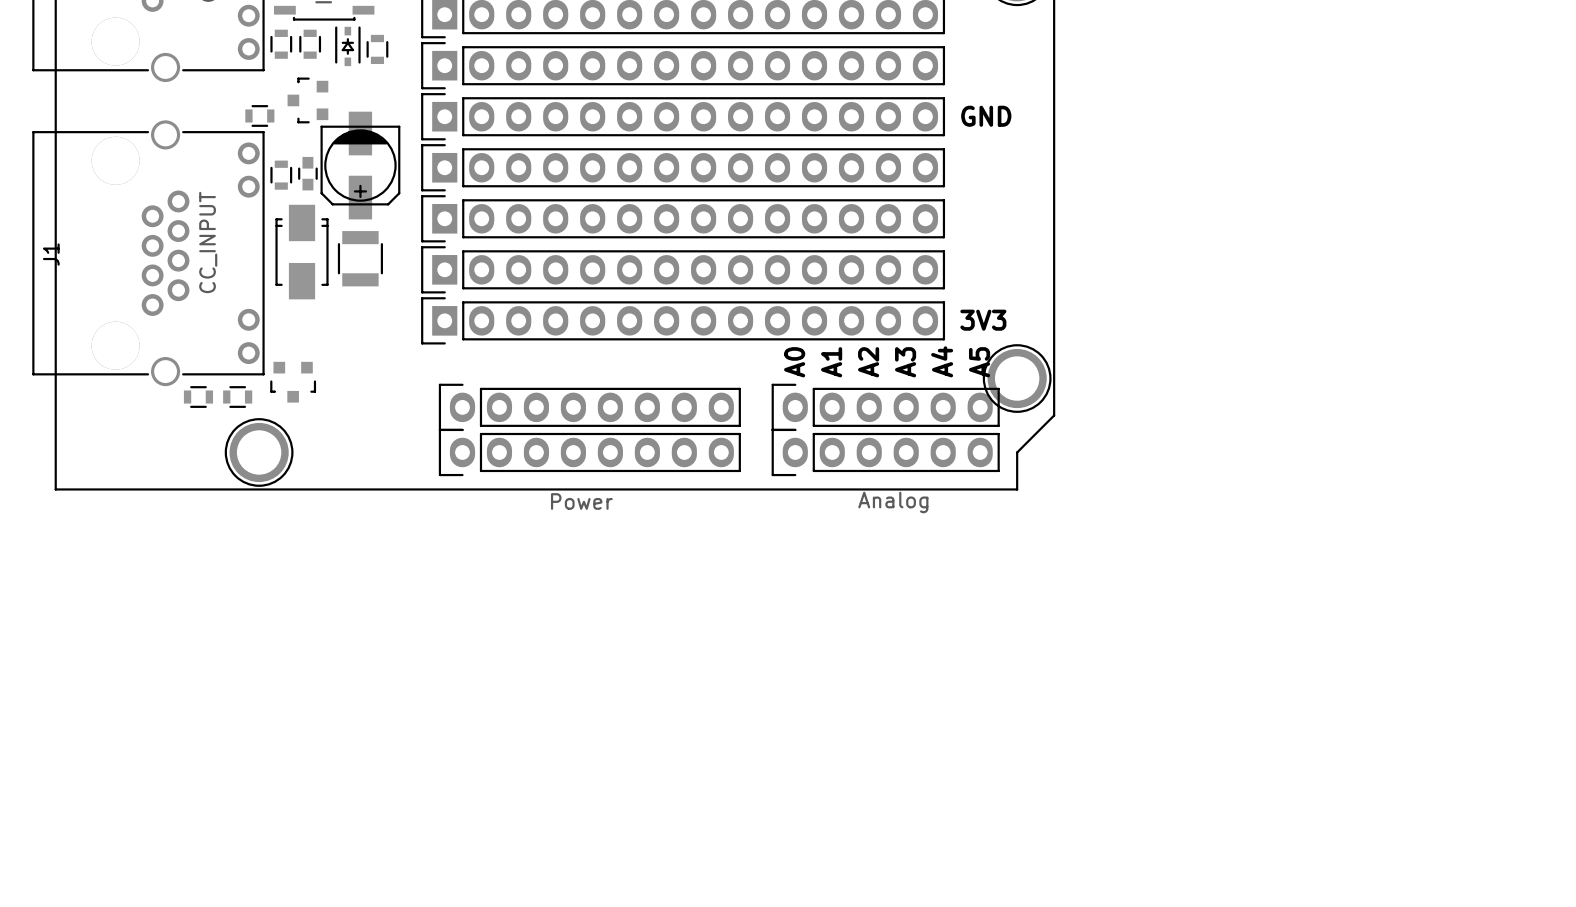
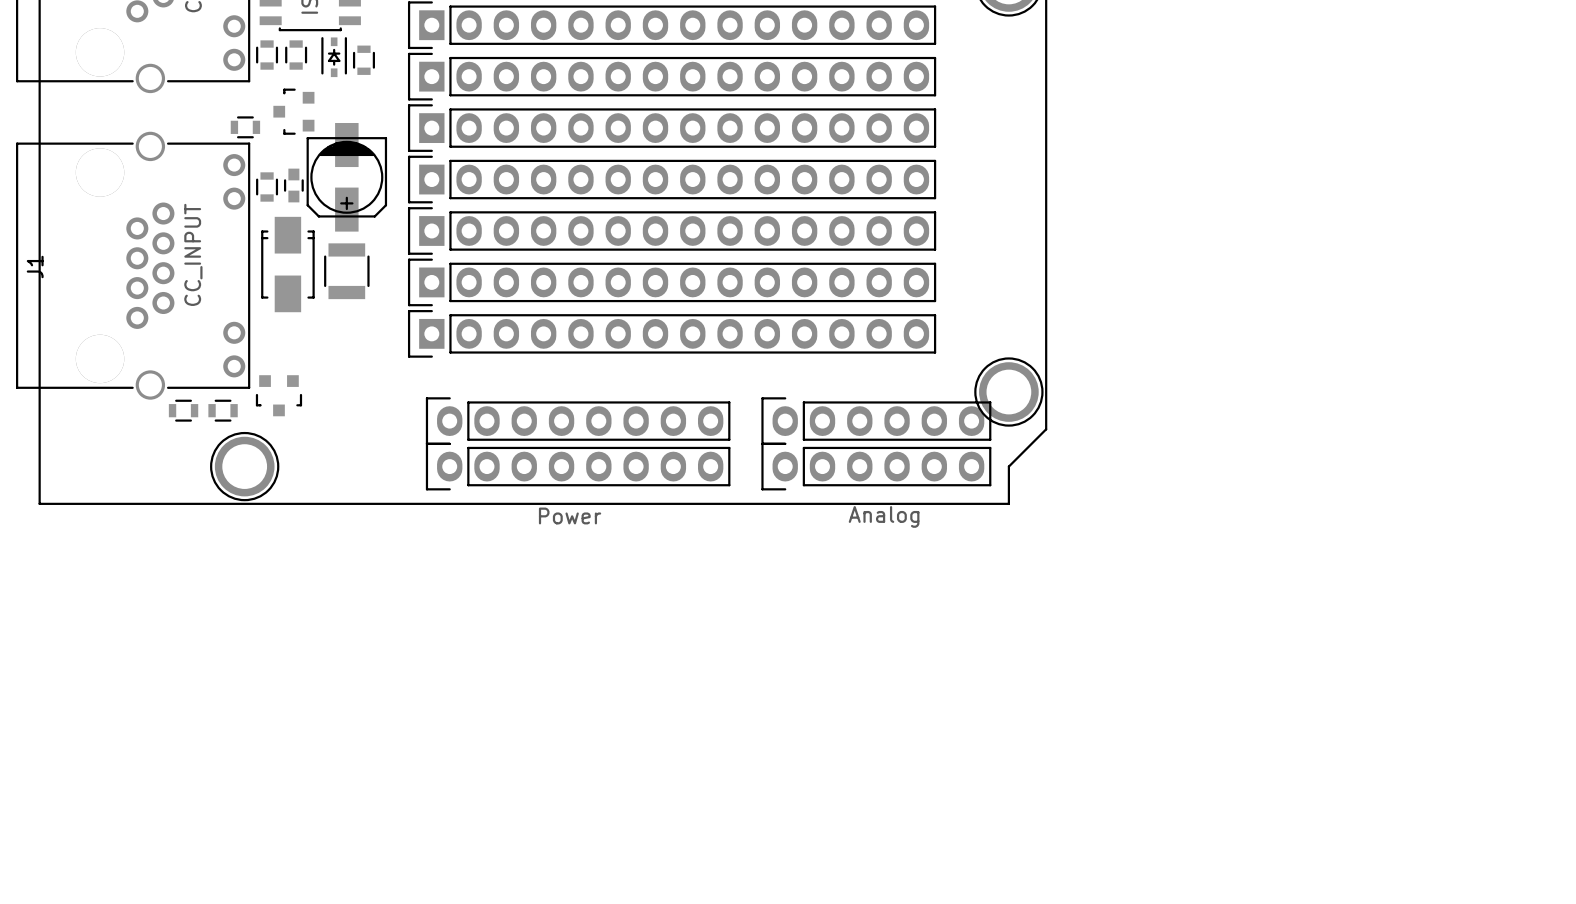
text: GND (986, 116) -> none
text: 3V3 (983, 320) -> none
text: A4 (942, 361) -> none
text: A0 (794, 362) -> none
text: A1 (831, 362) -> none
text: A2 (868, 362) -> none
text: A3 (905, 362) -> none
text: A5 (979, 362) -> none

